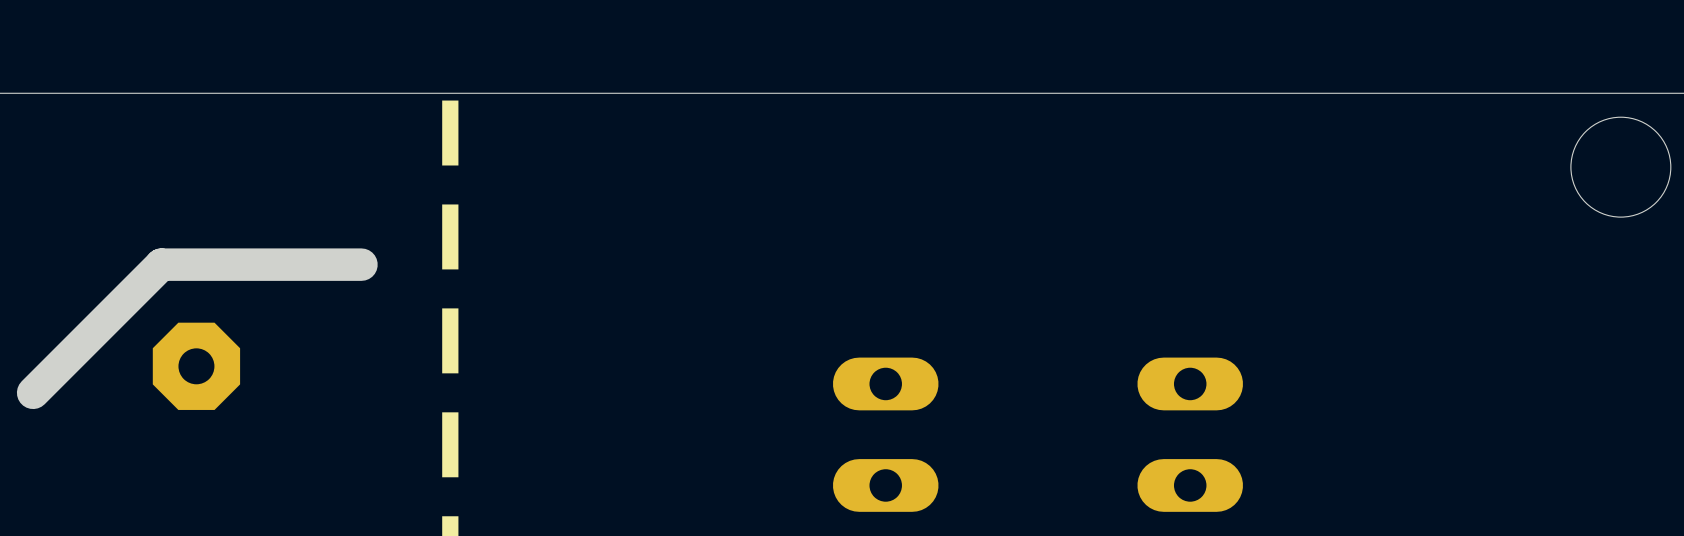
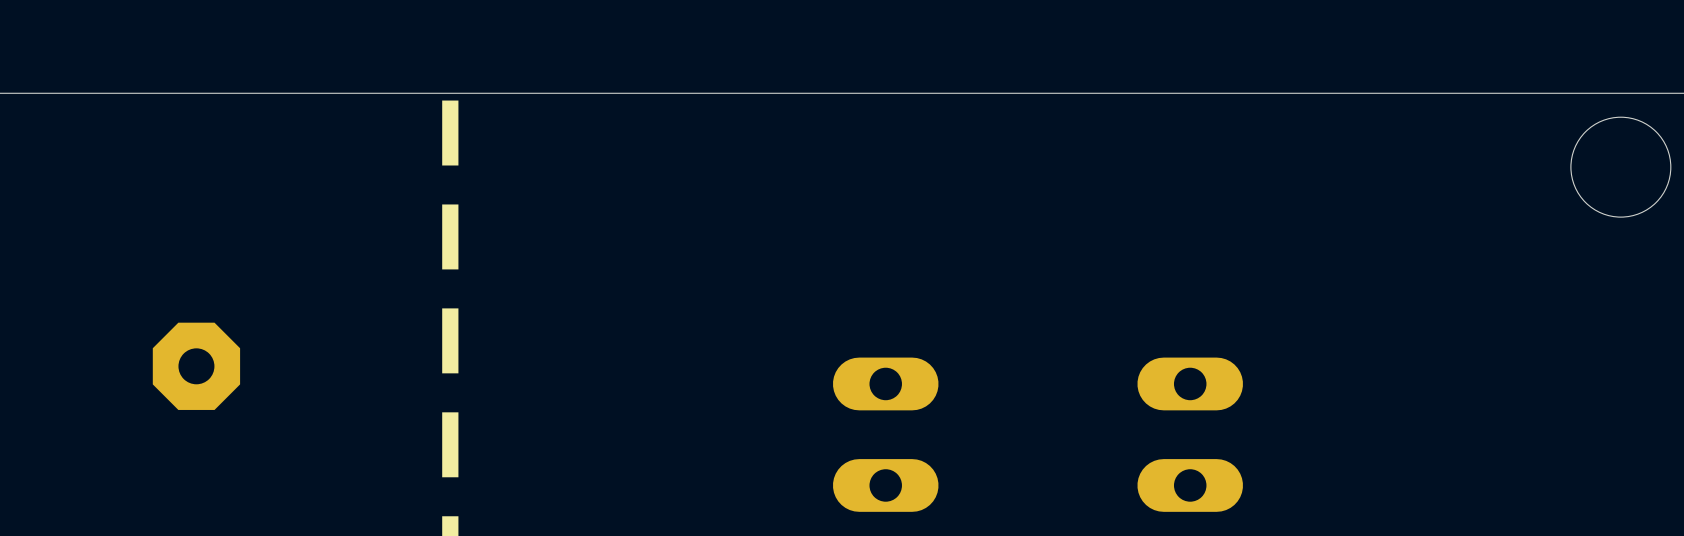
board edge: (361, 264) (161, 264) (33, 392) -> none

